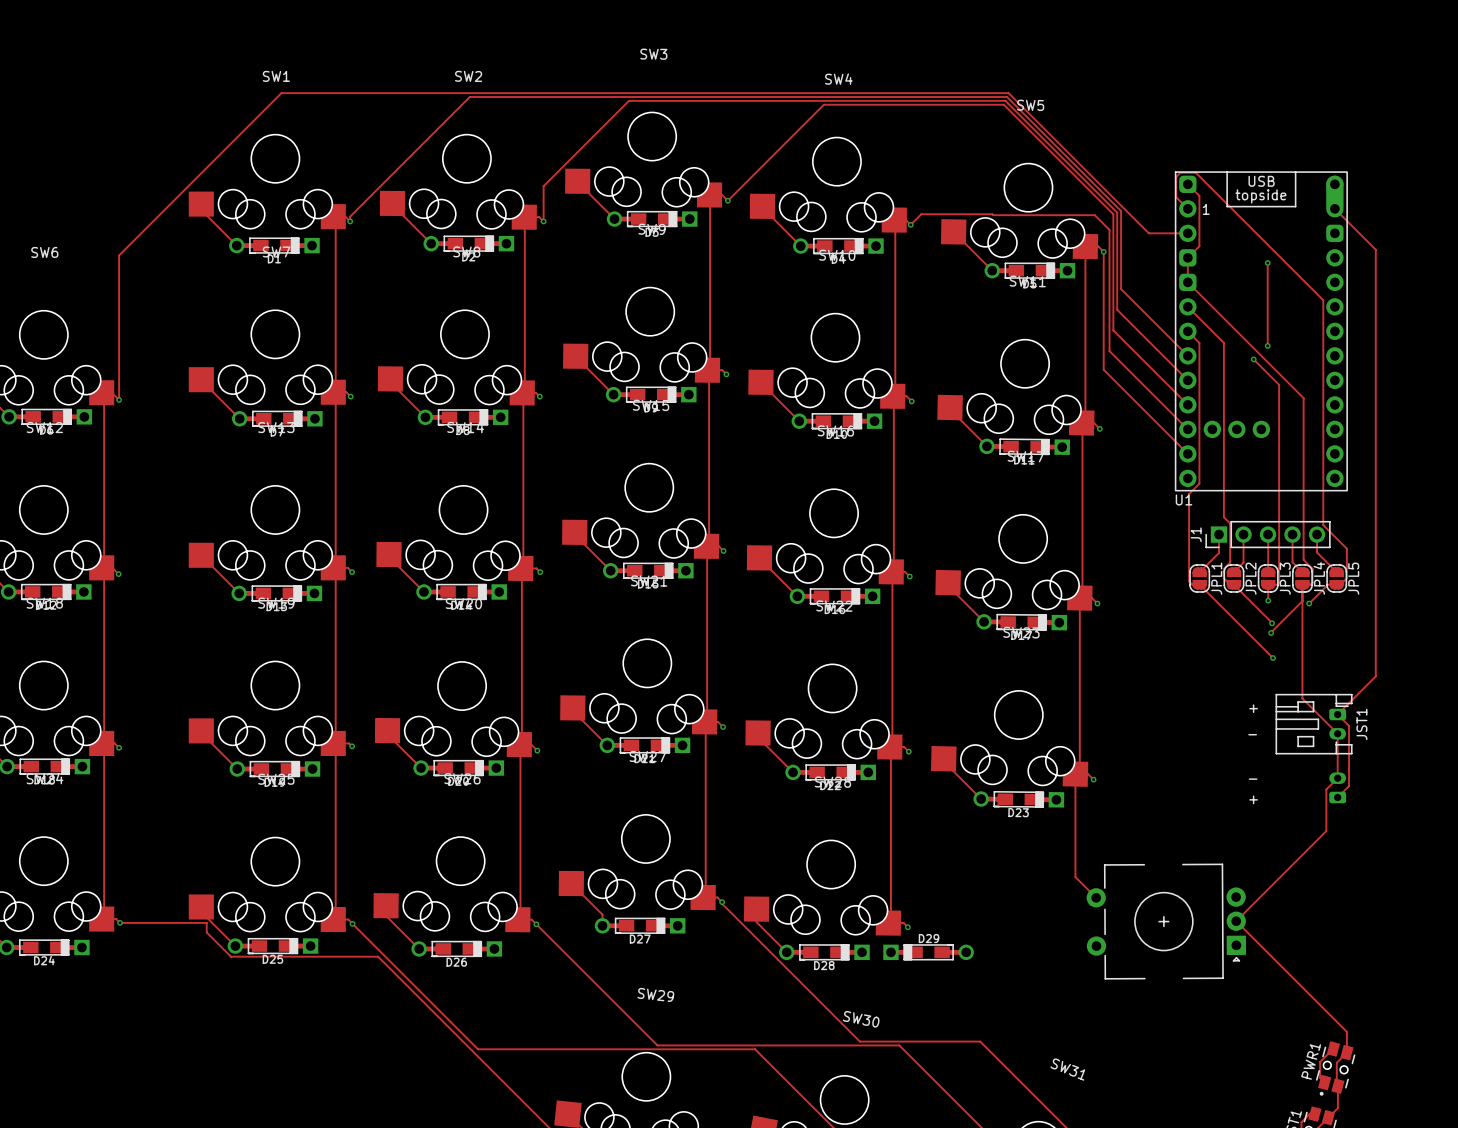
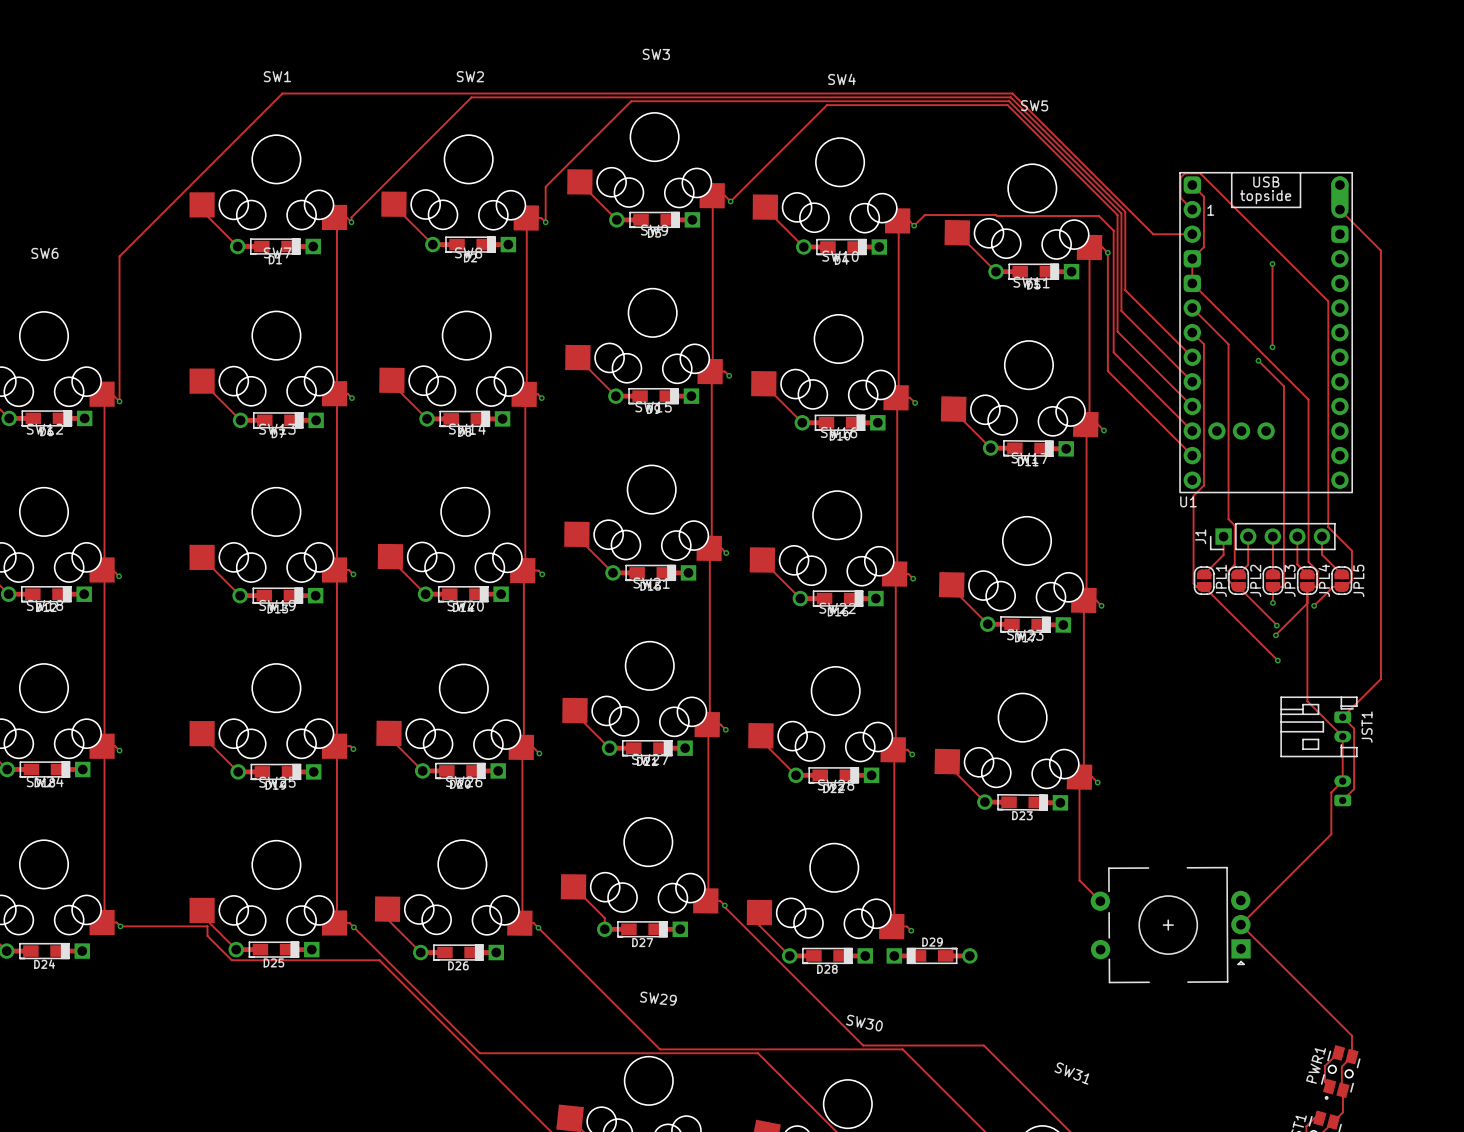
text: + (1253, 708) -> none
text: - (1252, 734) -> none
text: - (1253, 779) -> none
text: + (1253, 799) -> none

